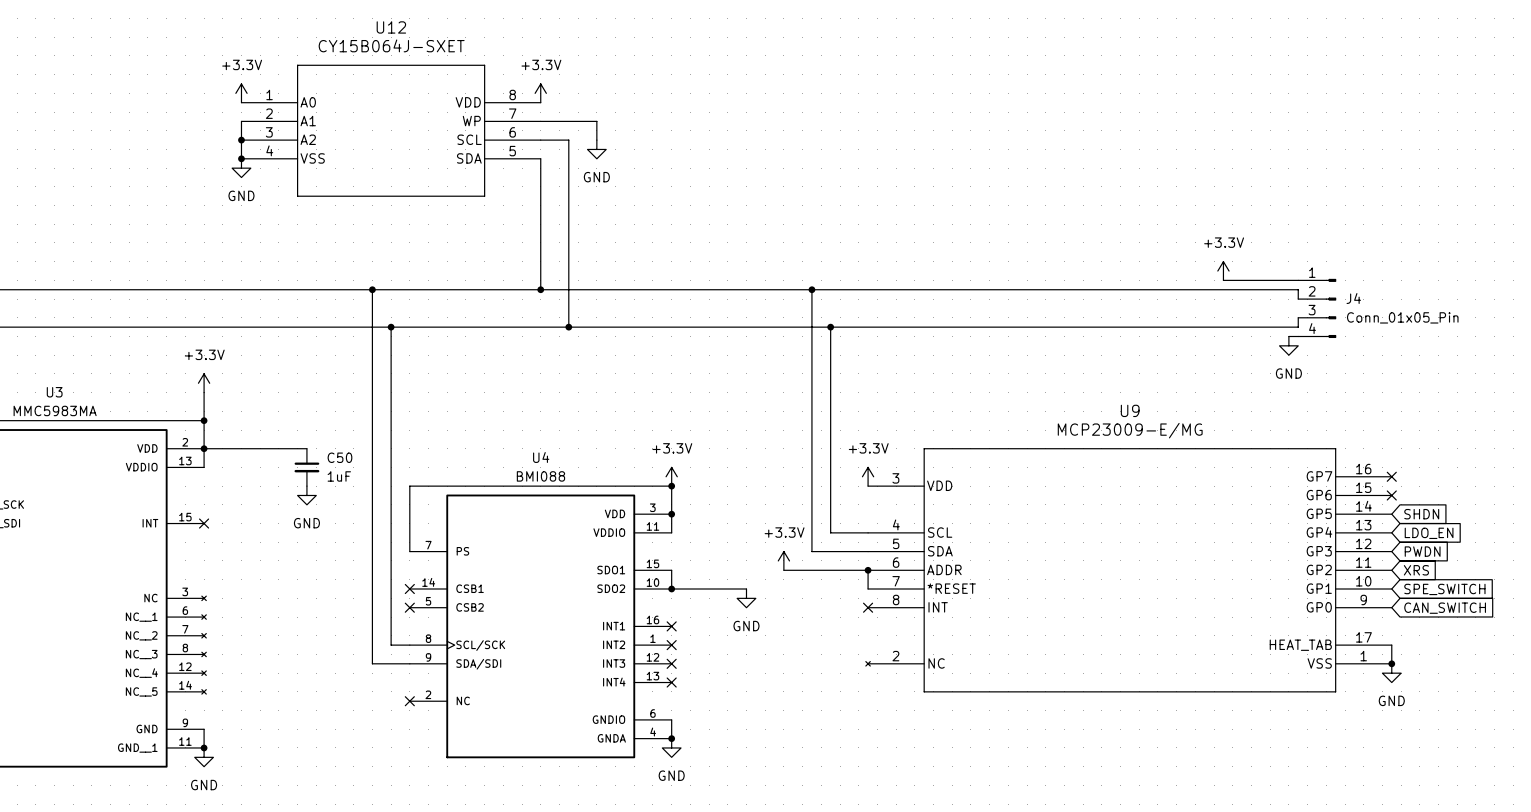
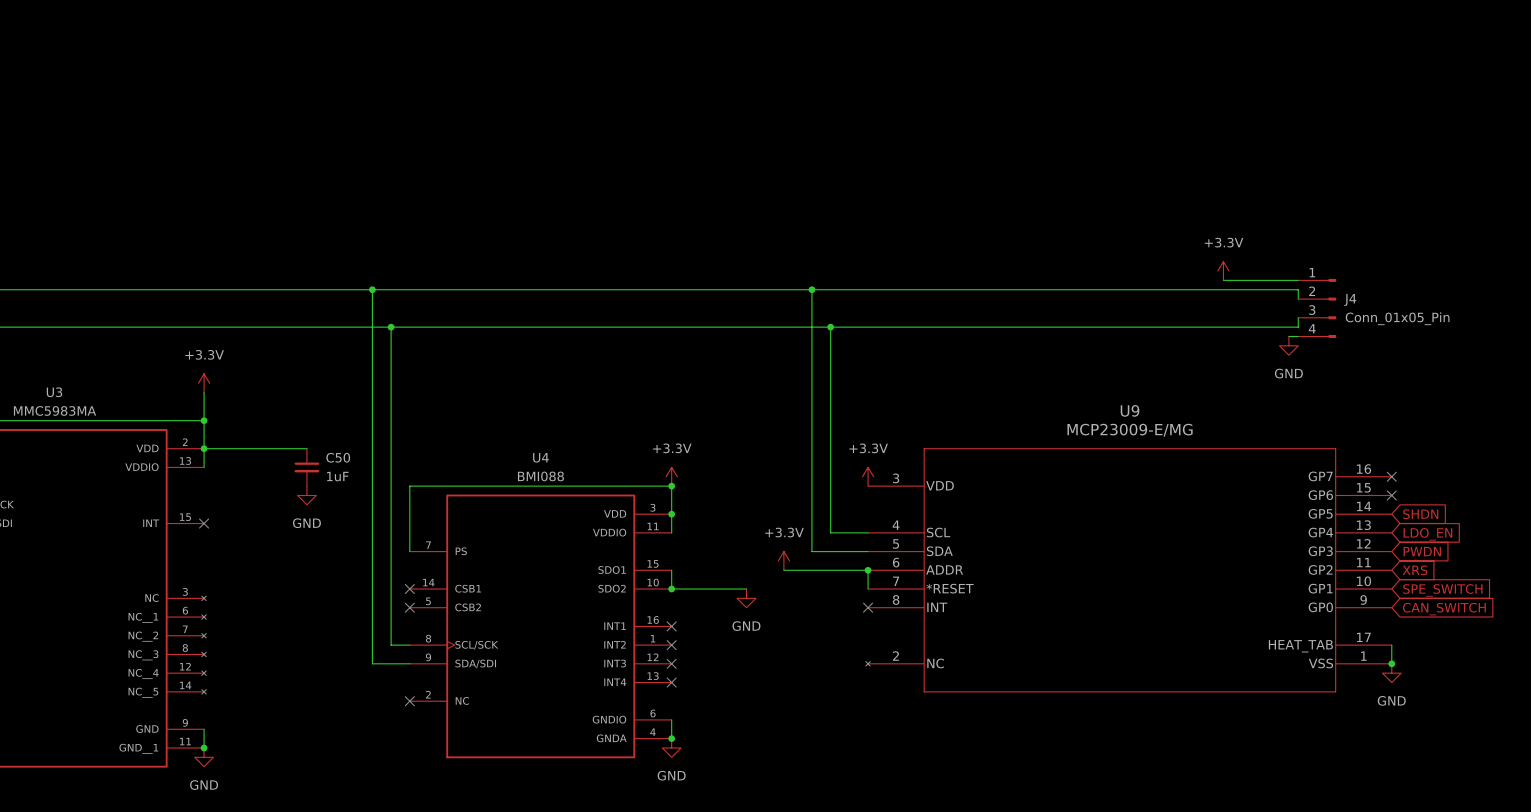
power symbol: +3.3V (241, 93) -> none
power symbol: +3.3V (540, 93) -> none
wire: (241, 121) (241, 158) -> none
wire: (540, 121) (596, 121) (596, 140) -> none
U12: CY15B064J-SXET (391, 130) -> none
junction: (241, 140) -> none
wire: (540, 140) (568, 140) (568, 327) -> none
power symbol: GND (596, 149) -> none
junction: (241, 158) -> none
wire: (540, 158) (540, 289) -> none
power symbol: GND (241, 168) -> none
junction: (540, 289) -> none
junction: (568, 327) -> none

